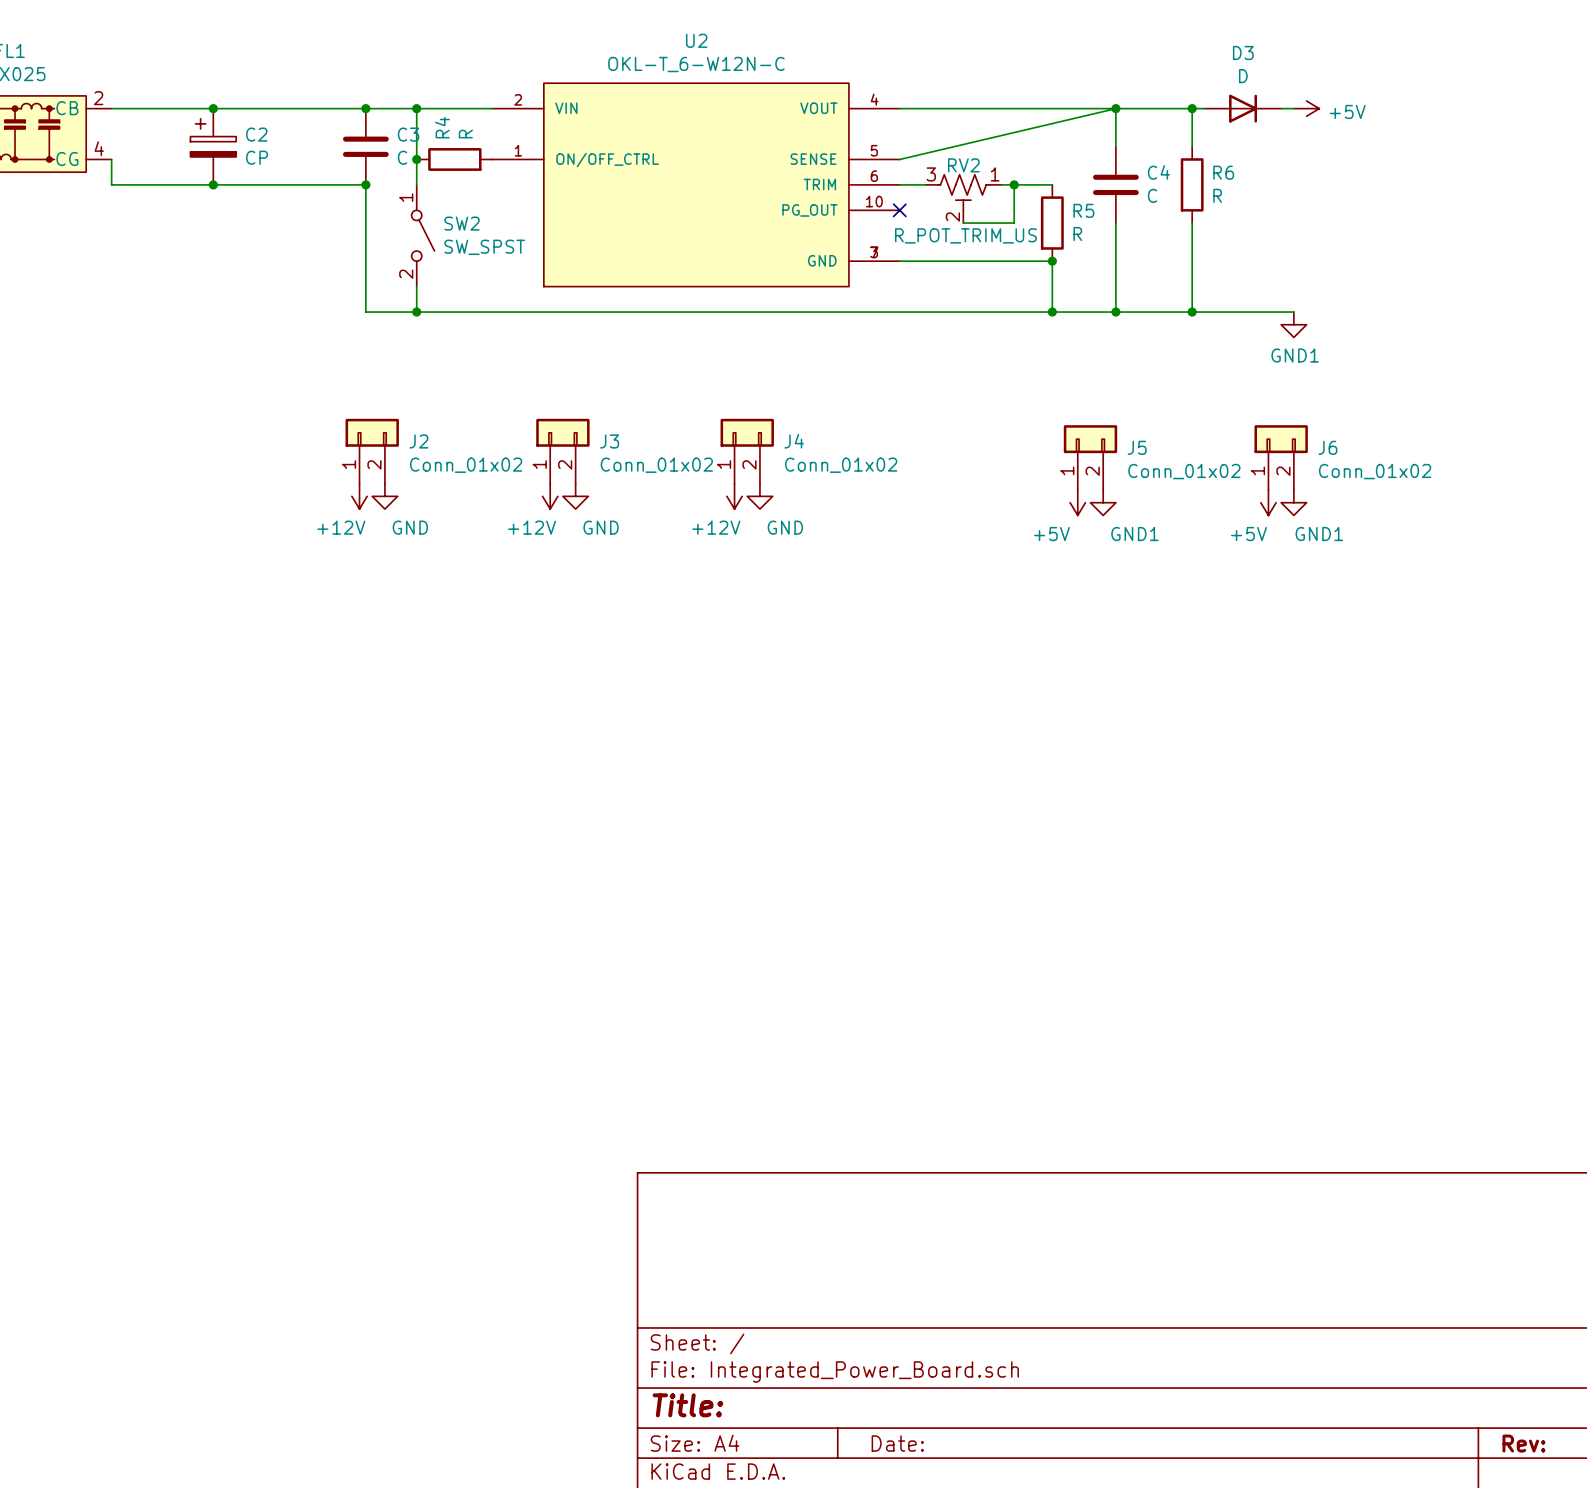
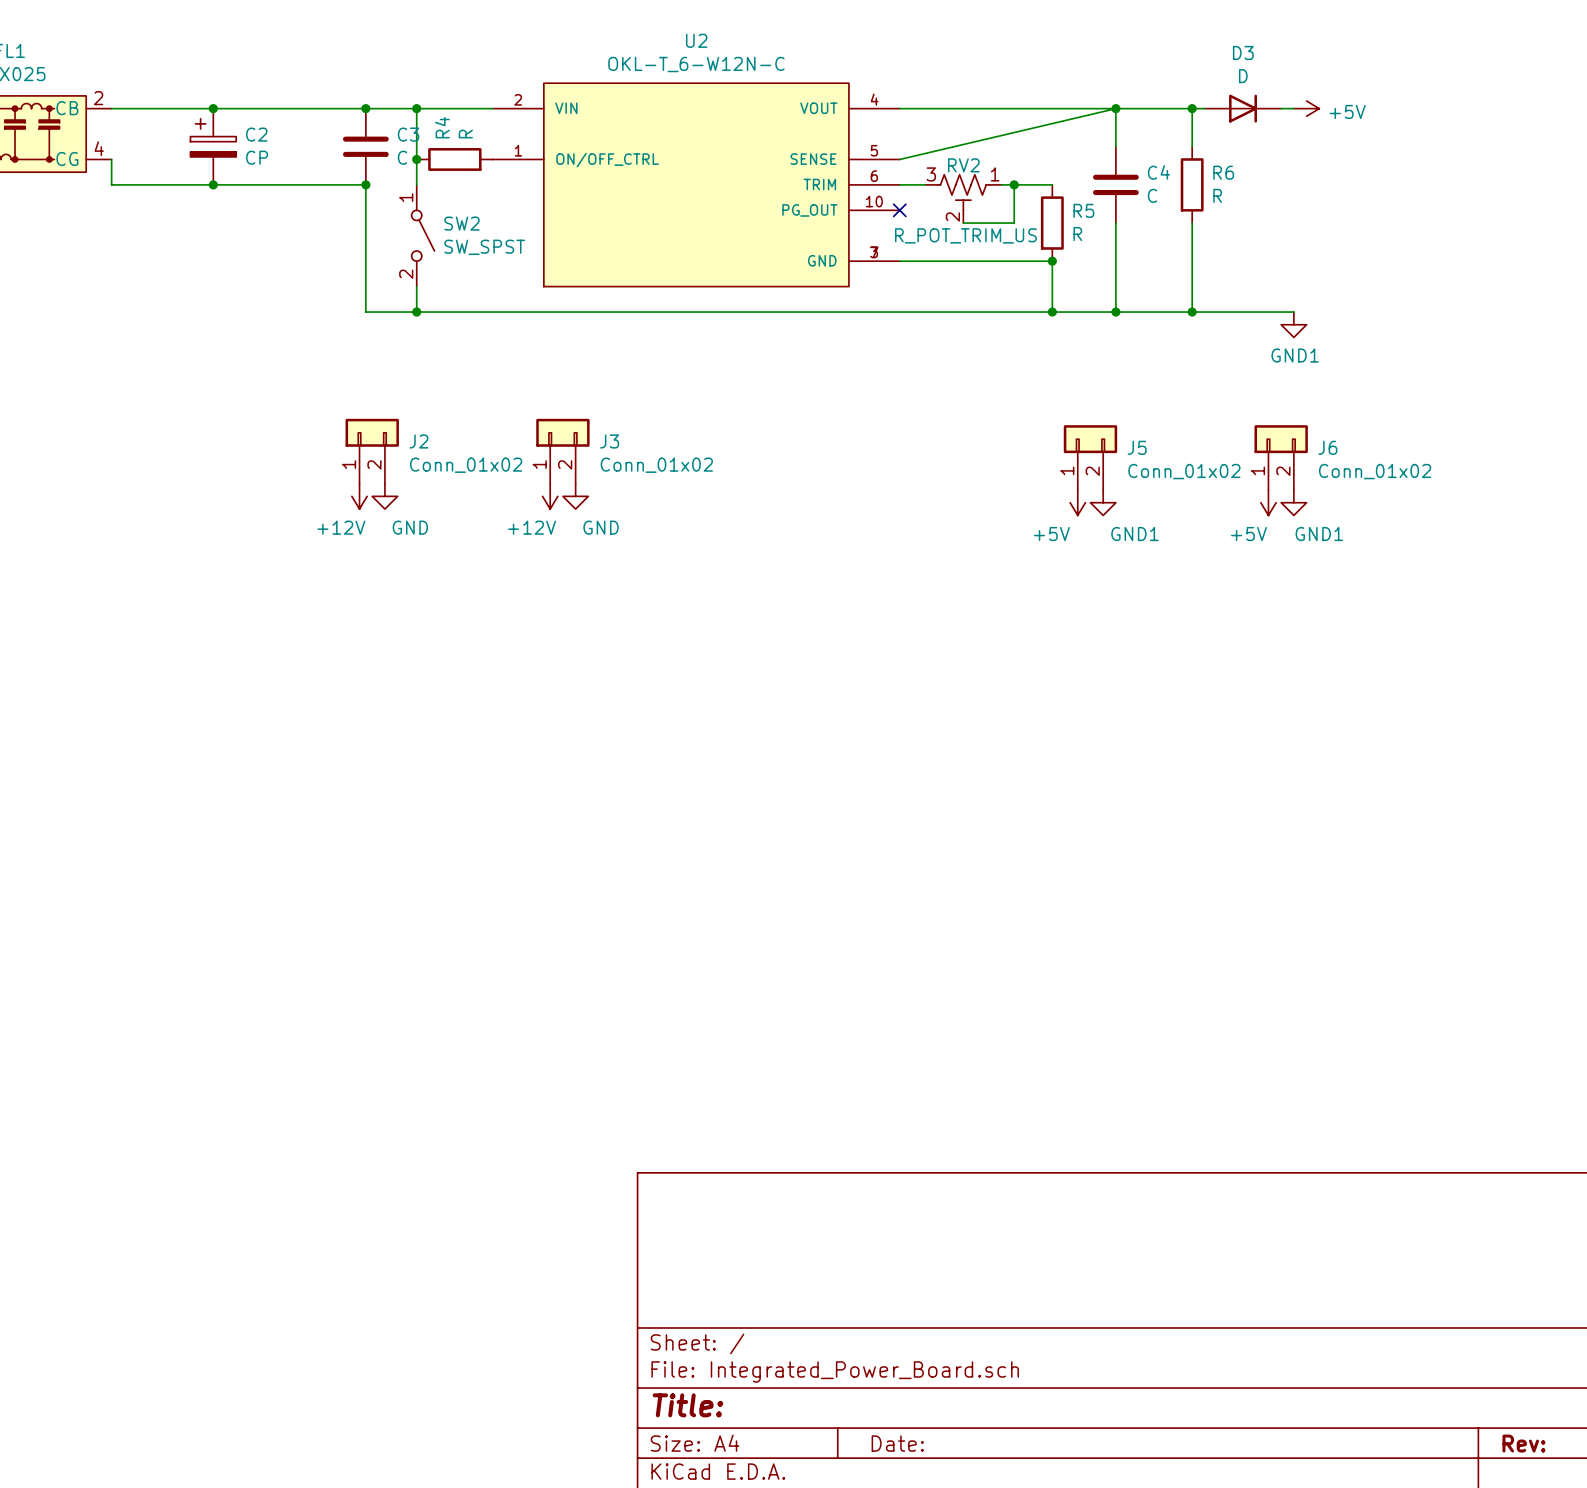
J4: Conn_01x02 (747, 451) -> none
power symbol: +12V (734, 496) -> none
power symbol: GND (759, 496) -> none

